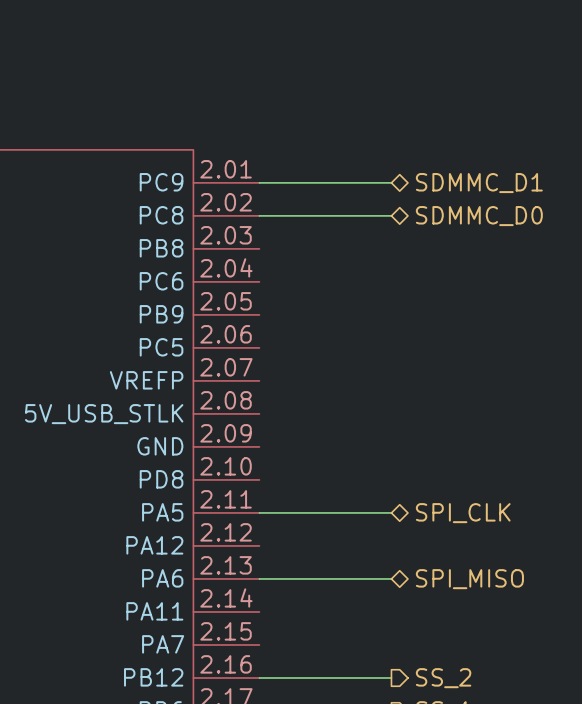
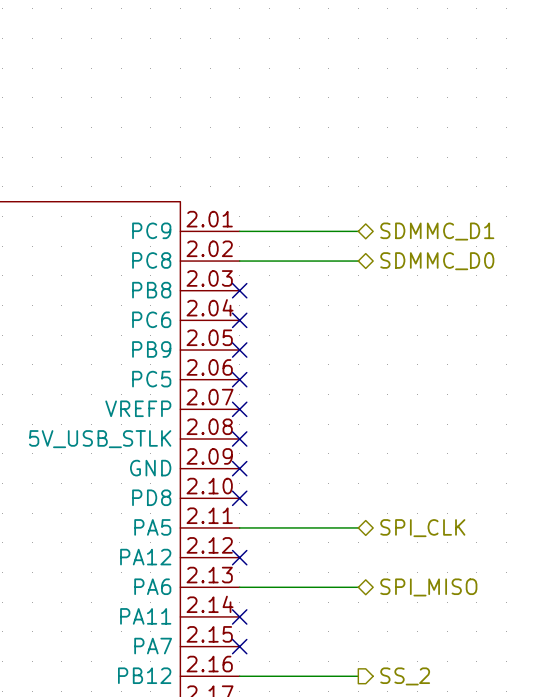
no-connect mark: none -> (239, 290)
no-connect mark: none -> (239, 320)
no-connect mark: none -> (239, 350)
no-connect mark: none -> (239, 379)
no-connect mark: none -> (239, 409)
no-connect mark: none -> (239, 438)
no-connect mark: none -> (239, 468)
no-connect mark: none -> (239, 498)
no-connect mark: none -> (239, 557)
no-connect mark: none -> (239, 616)
no-connect mark: none -> (239, 646)

